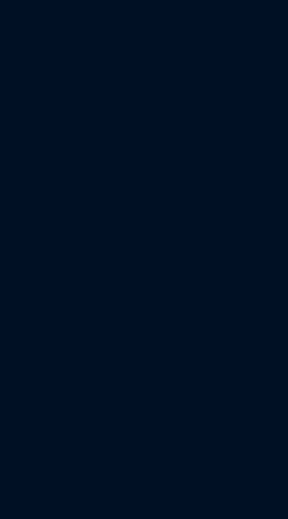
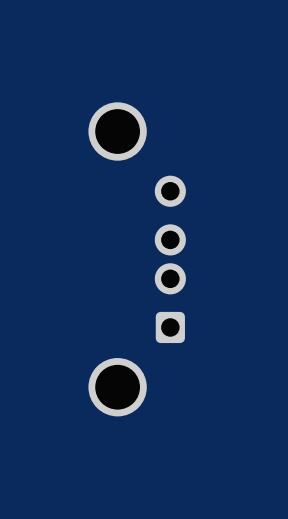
part: none -> (137, 259)

